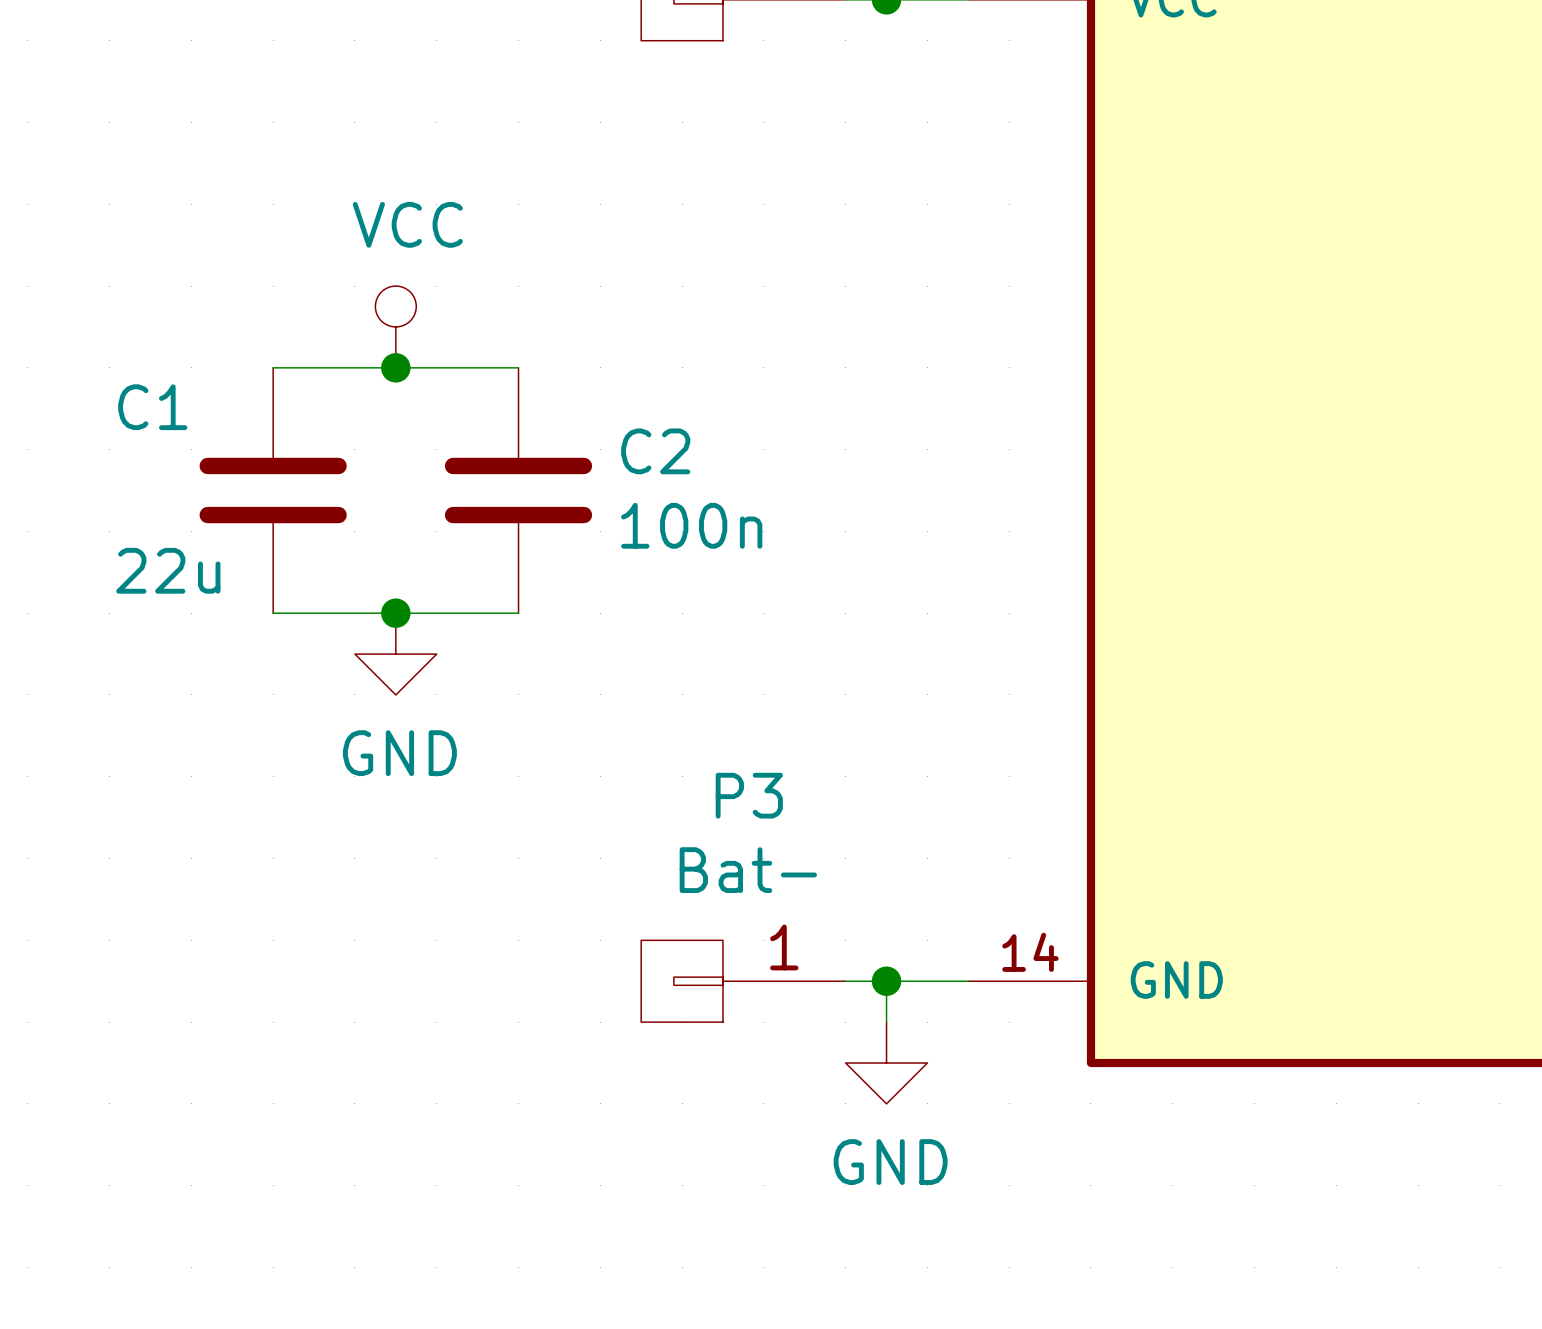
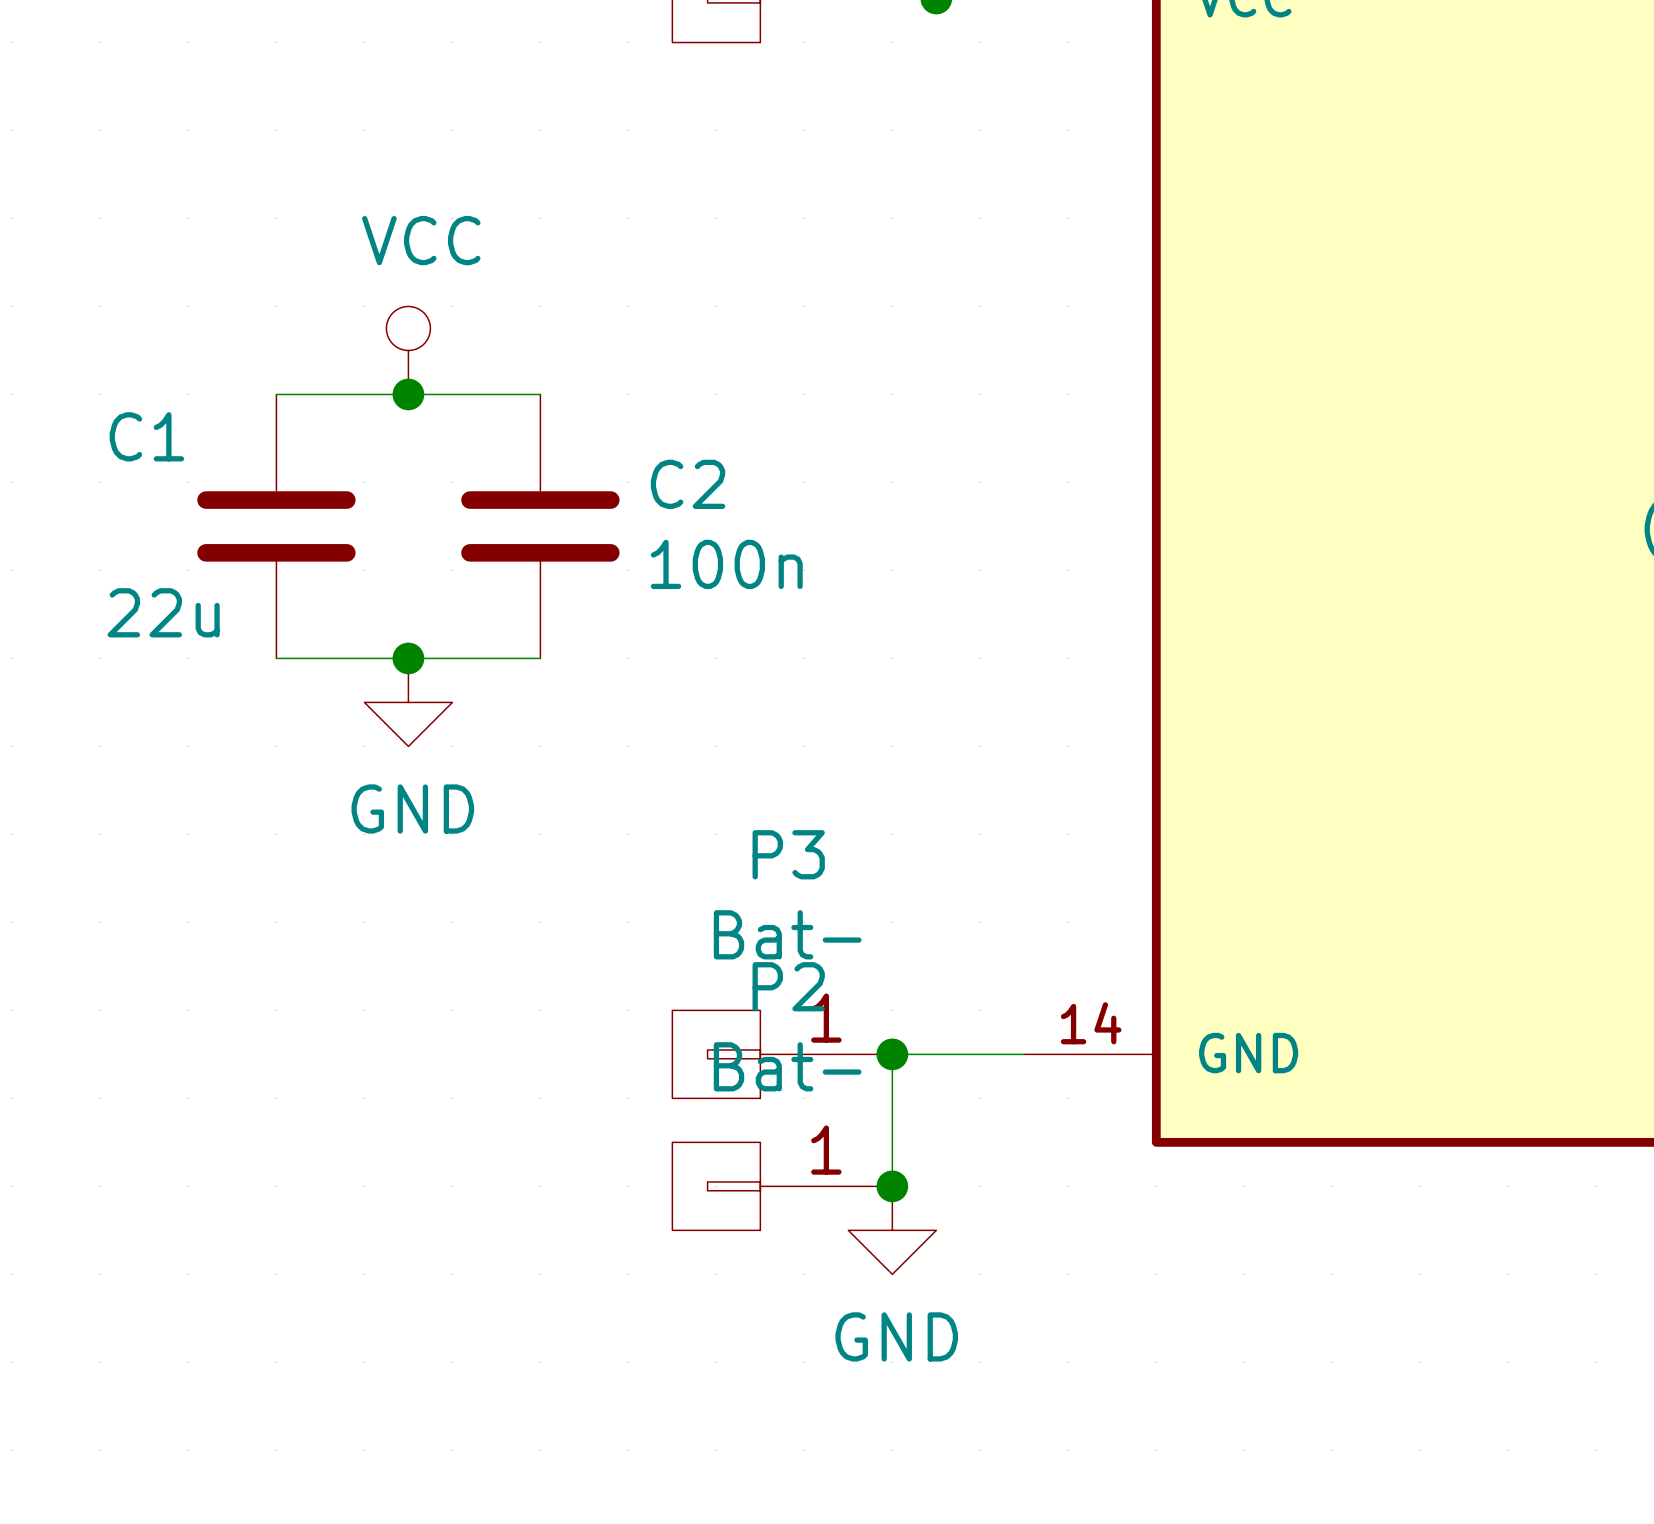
wire: none -> (892, 1054) (892, 1186)
wire: (886, 981) (886, 1022) -> none
junction position: (886, 981) -> (892, 1054)
power symbol position: GND (886, 1063) -> GND (892, 1230)
P2: none -> Bat- (782, 1186)
junction: none -> (892, 1186)

